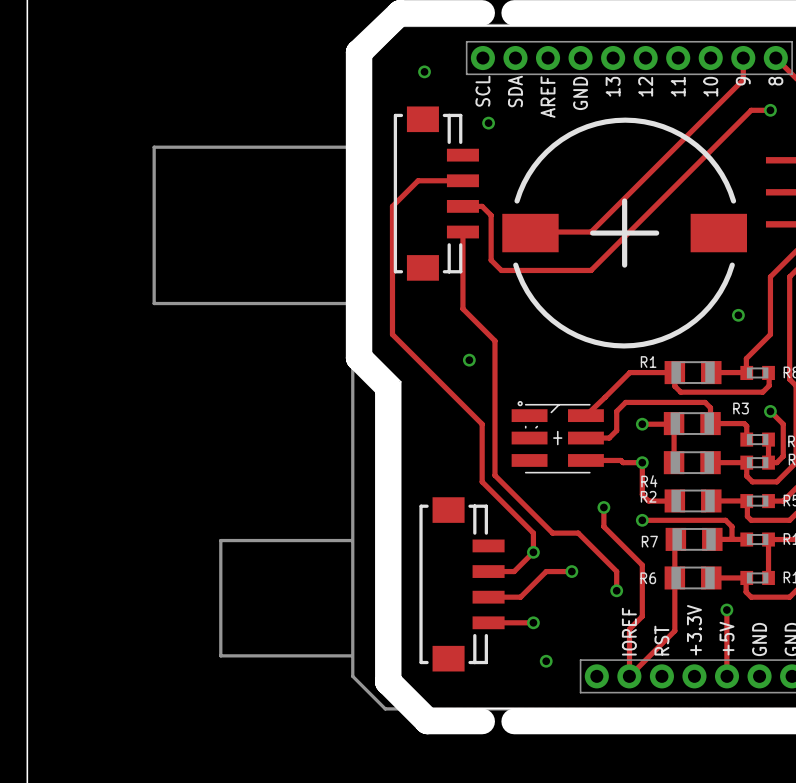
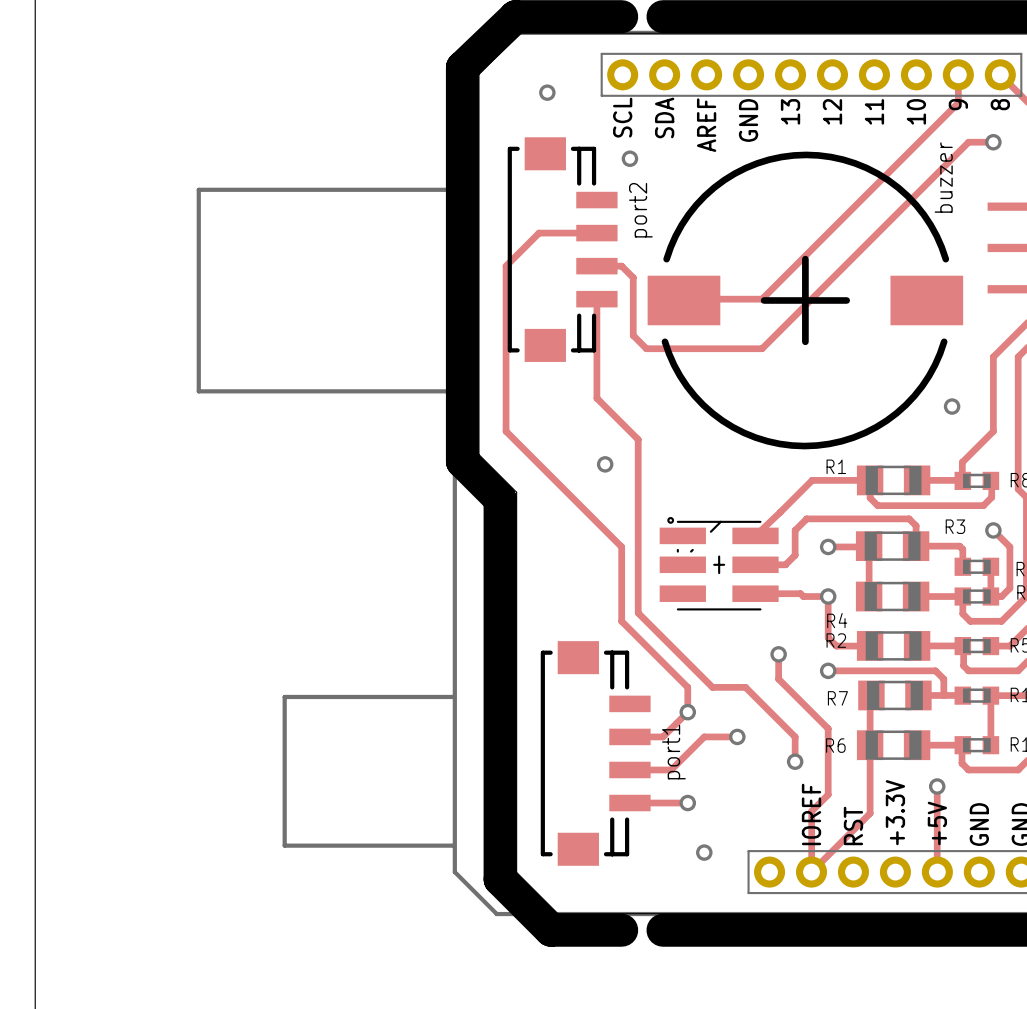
text: none -> buzzer (943, 177)
text: none -> port2 (640, 210)
text: none -> port1 (673, 752)

